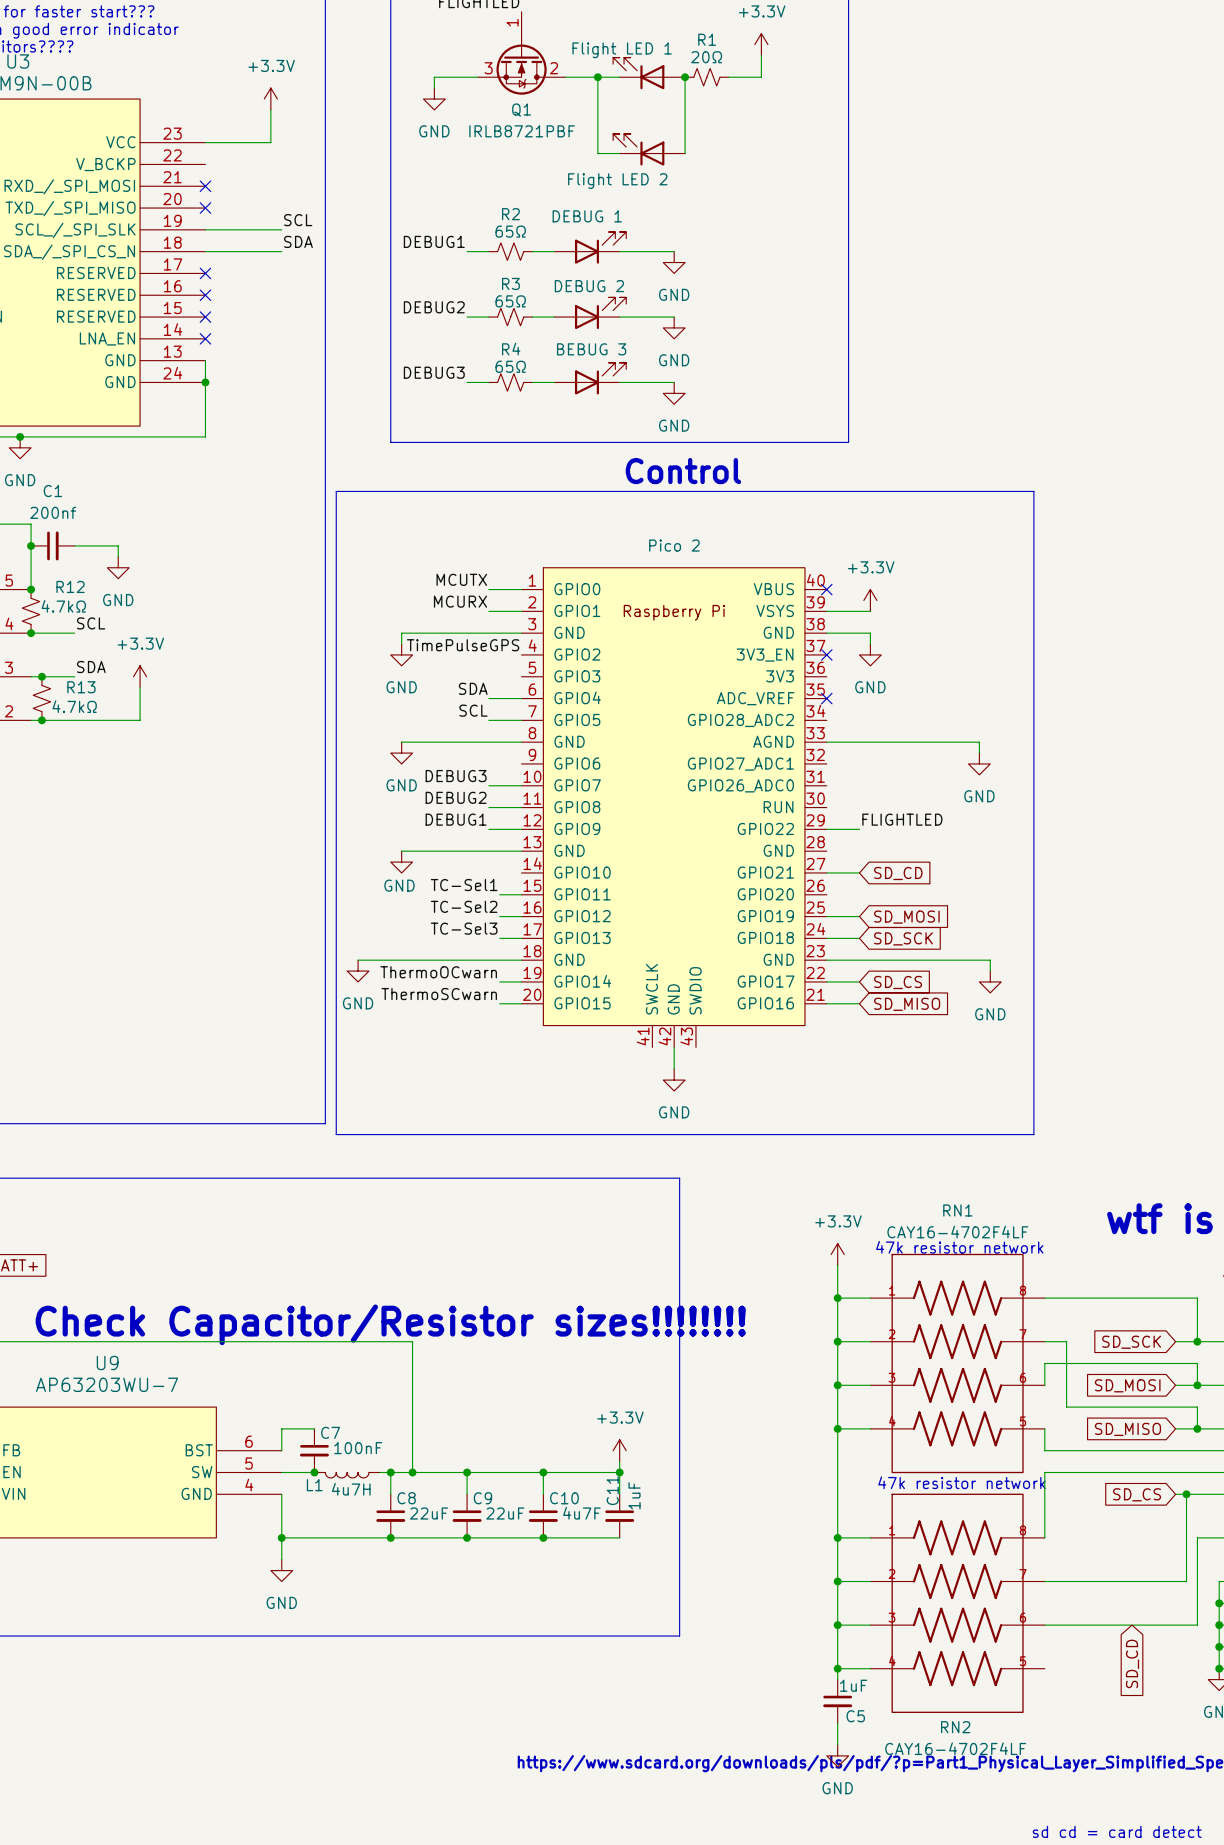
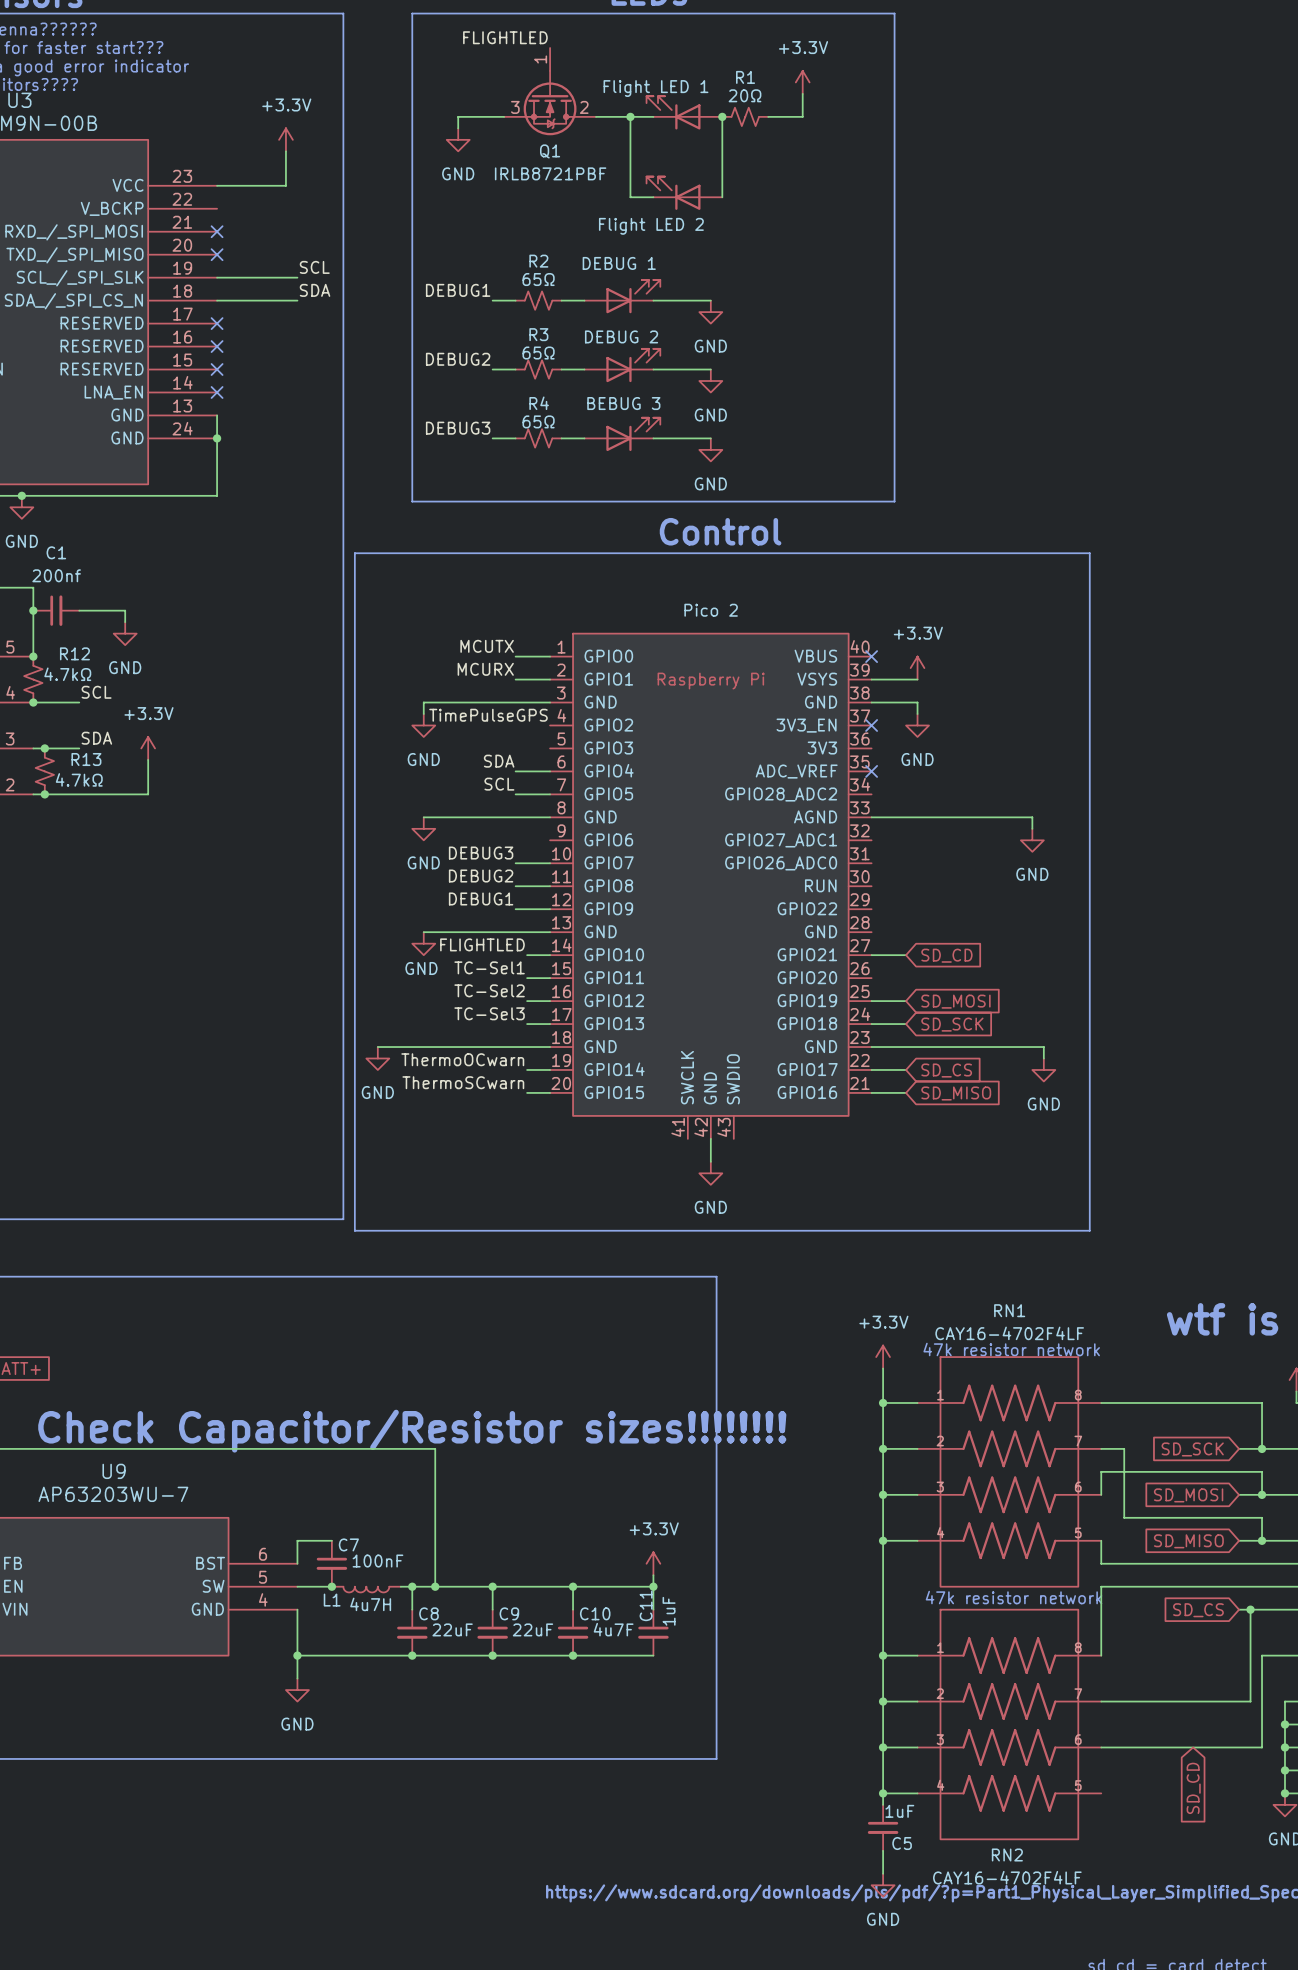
label: FLIGHTLED (902, 819) -> none
wire: (826, 829) (859, 829) -> none
label: none -> FLIGHTLED (482, 944)
wire: none -> (527, 955) (550, 955)

